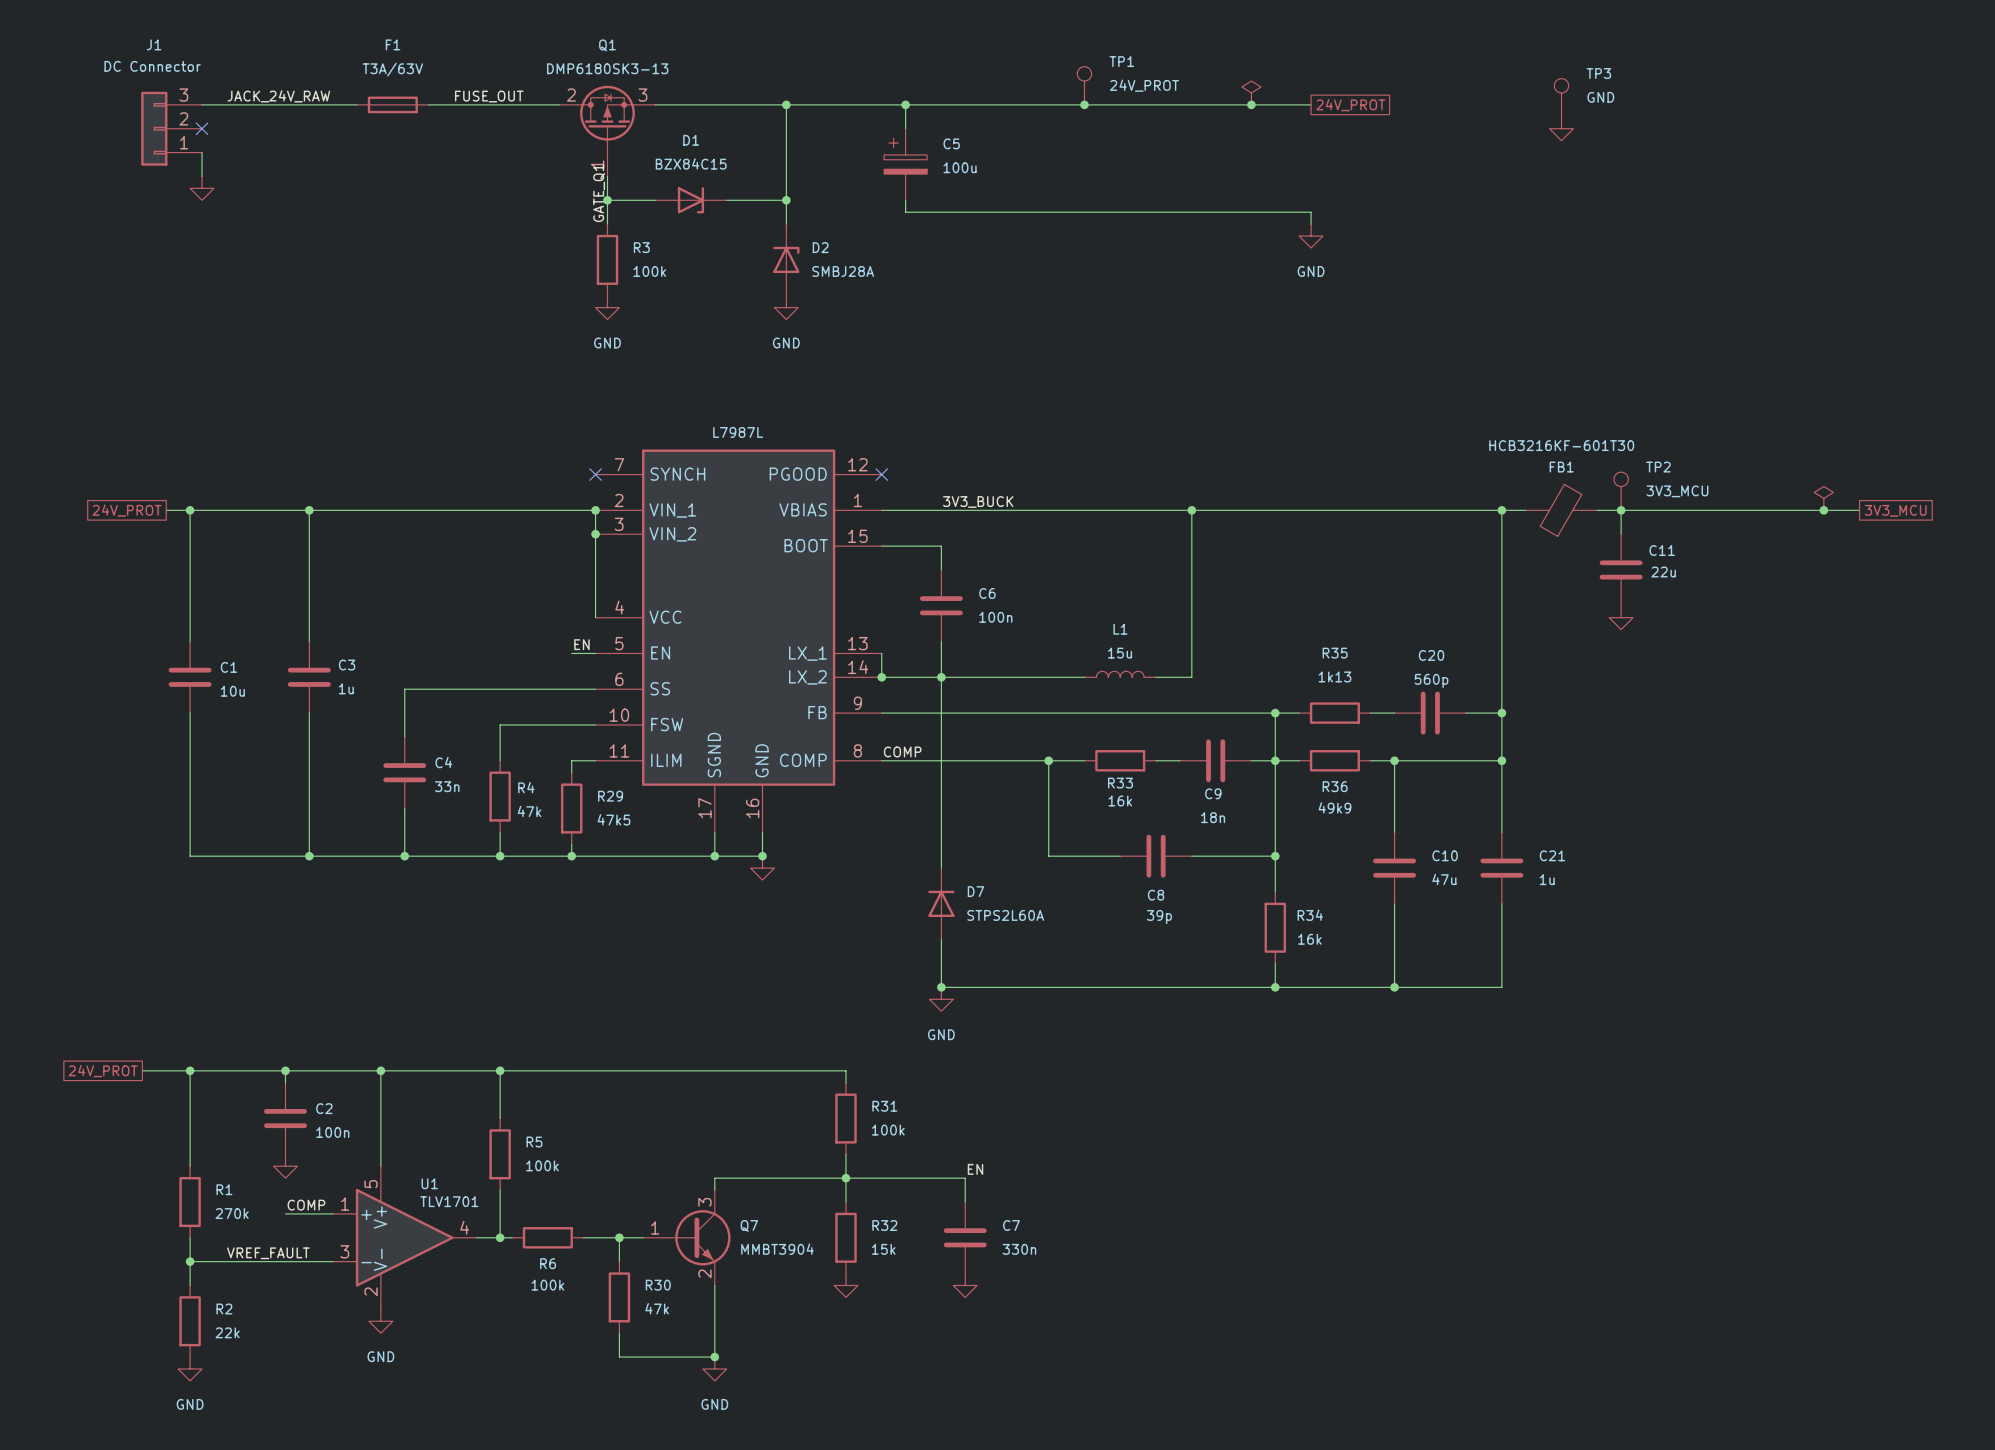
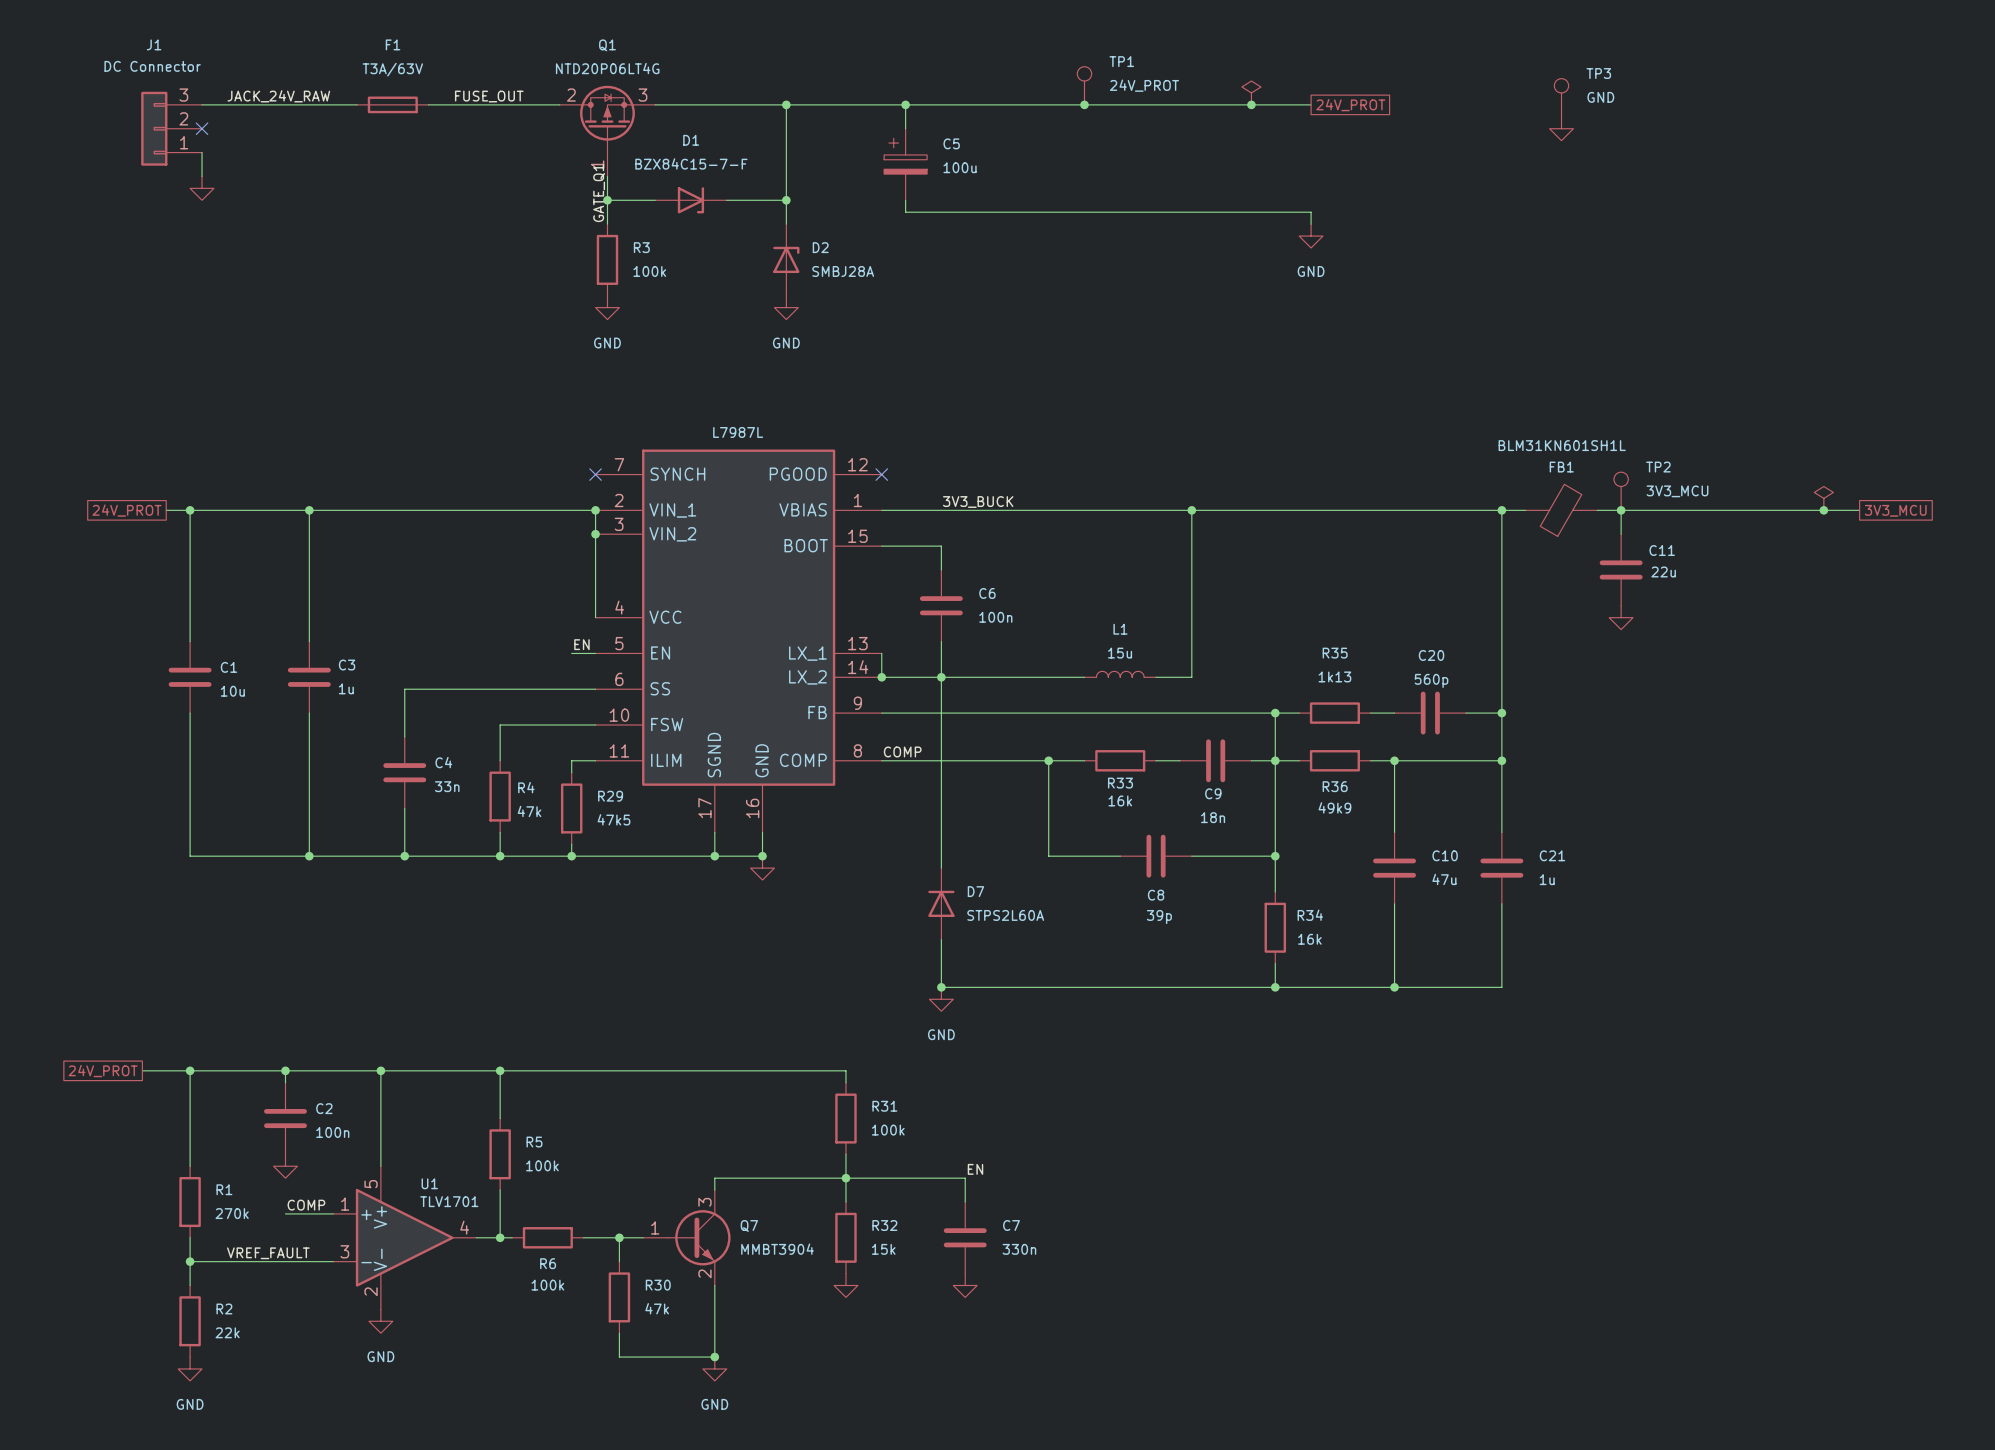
Q1 value: DMP6180SK3-13 (607, 68) -> NTD20P06LT4G (607, 68)
D1 value: BZX84C15 (691, 163) -> BZX84C15-7-F (691, 163)
FB1 value: HCB3216KF-601T30 (1561, 445) -> BLM31KN601SH1L (1562, 445)

